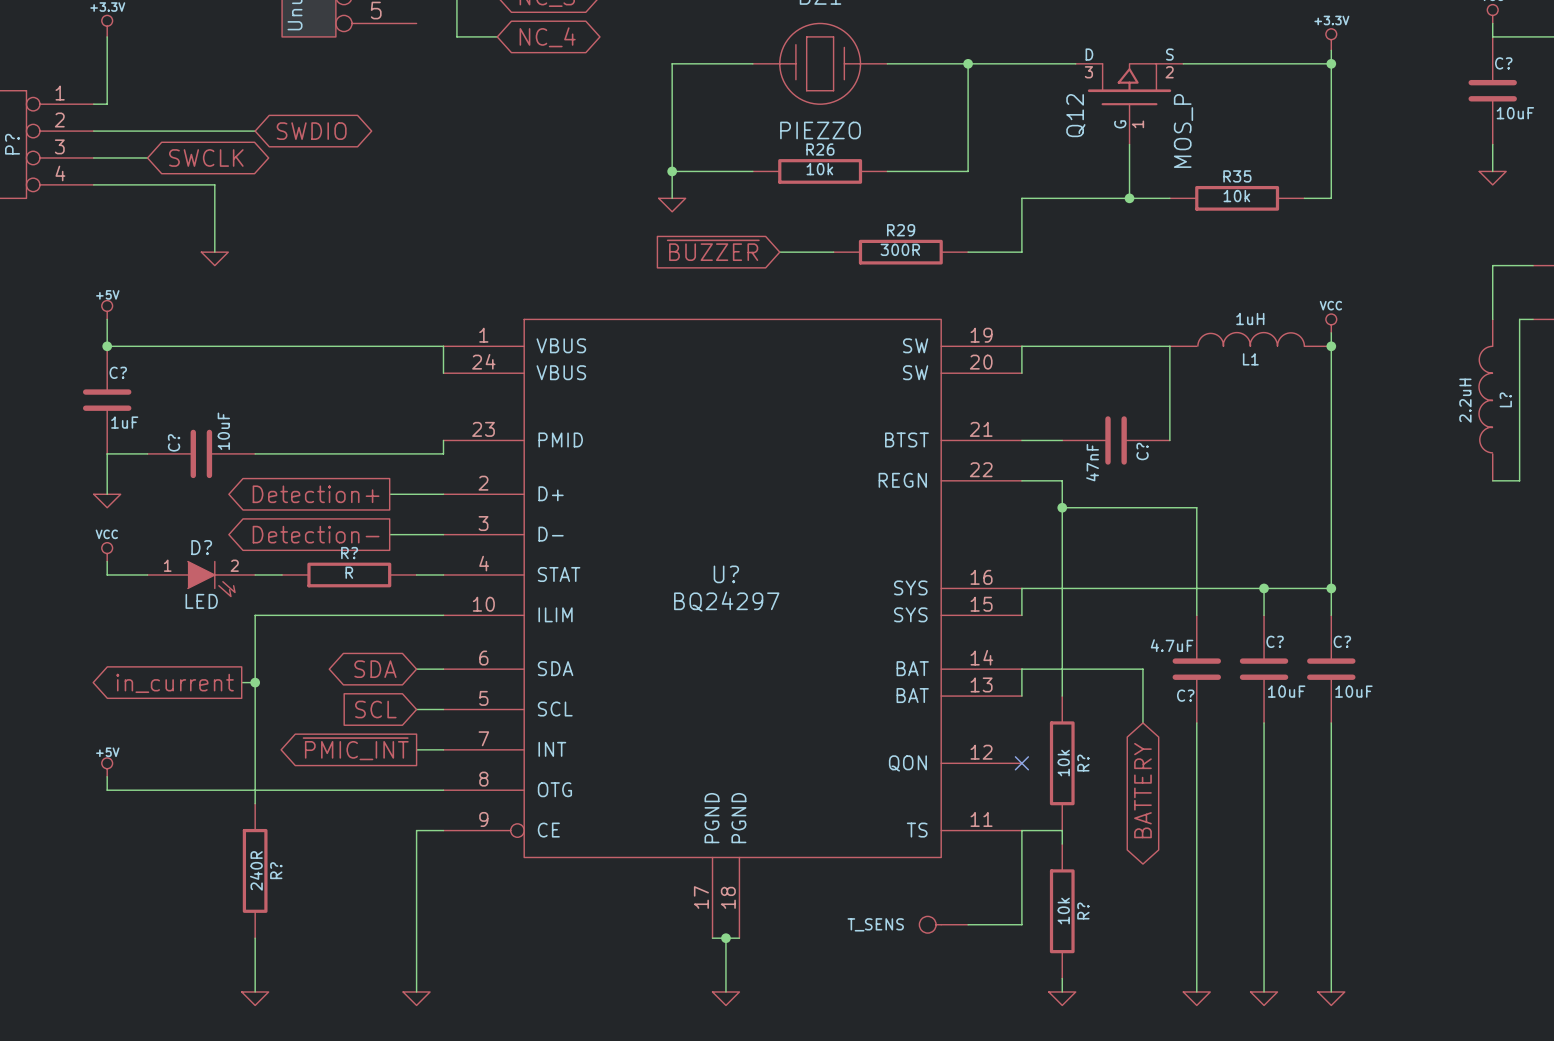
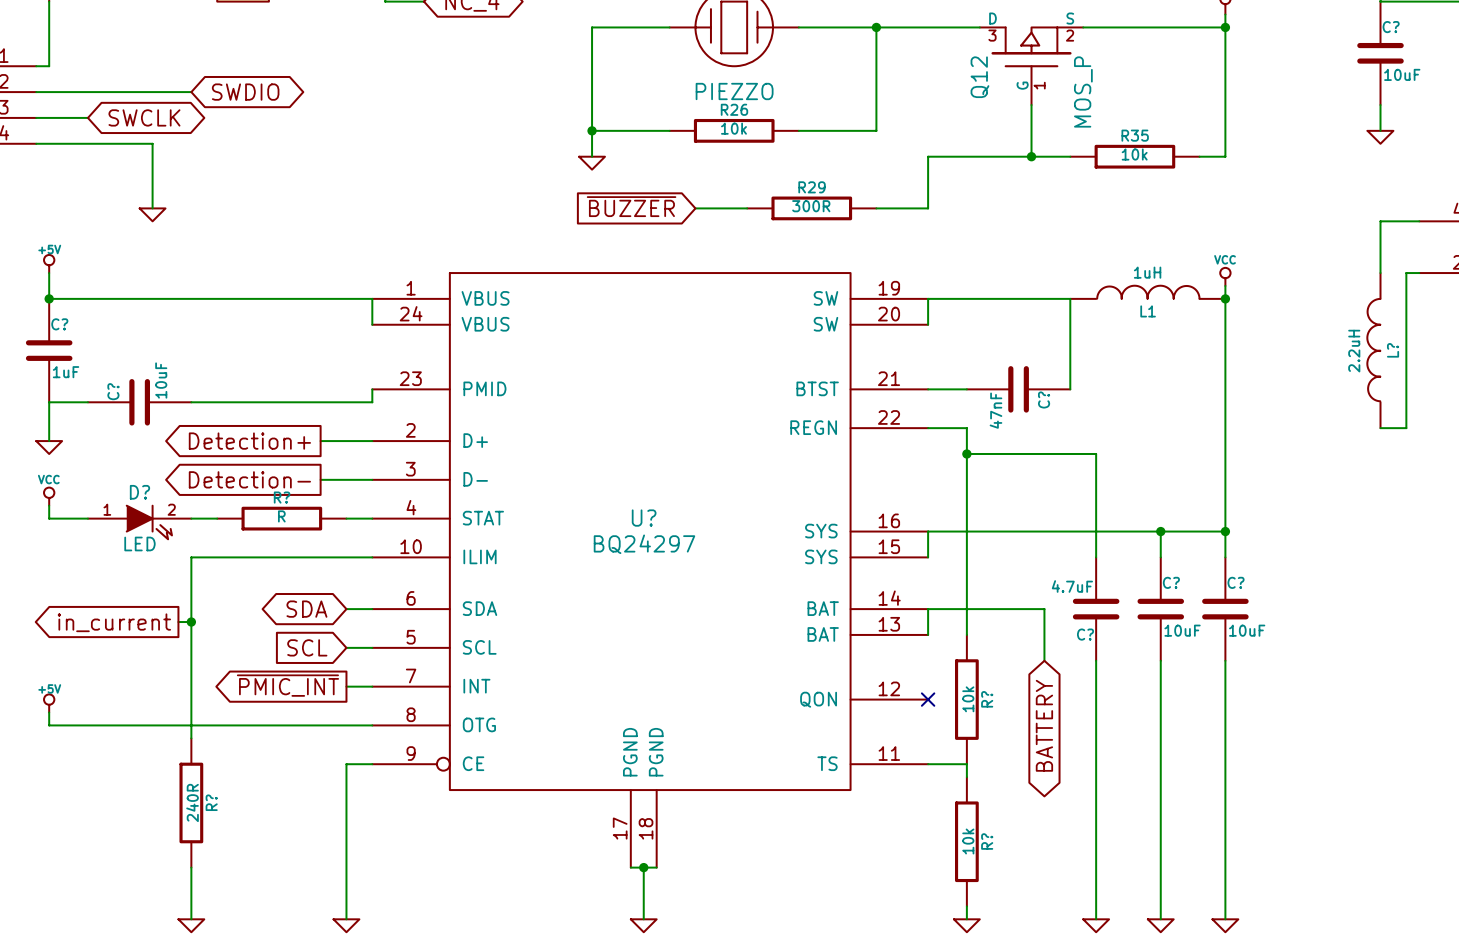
wire: (1021, 830) (1021, 924) (968, 924) -> none
T_SENS: (943, 924) -> none

